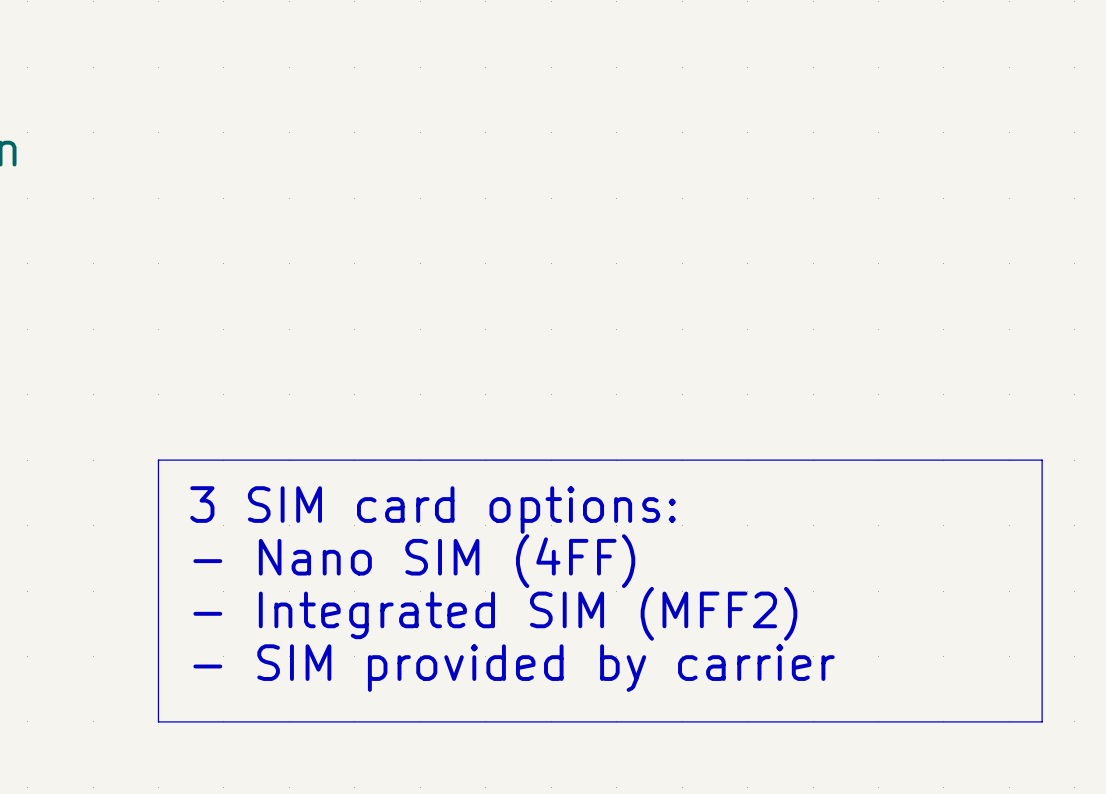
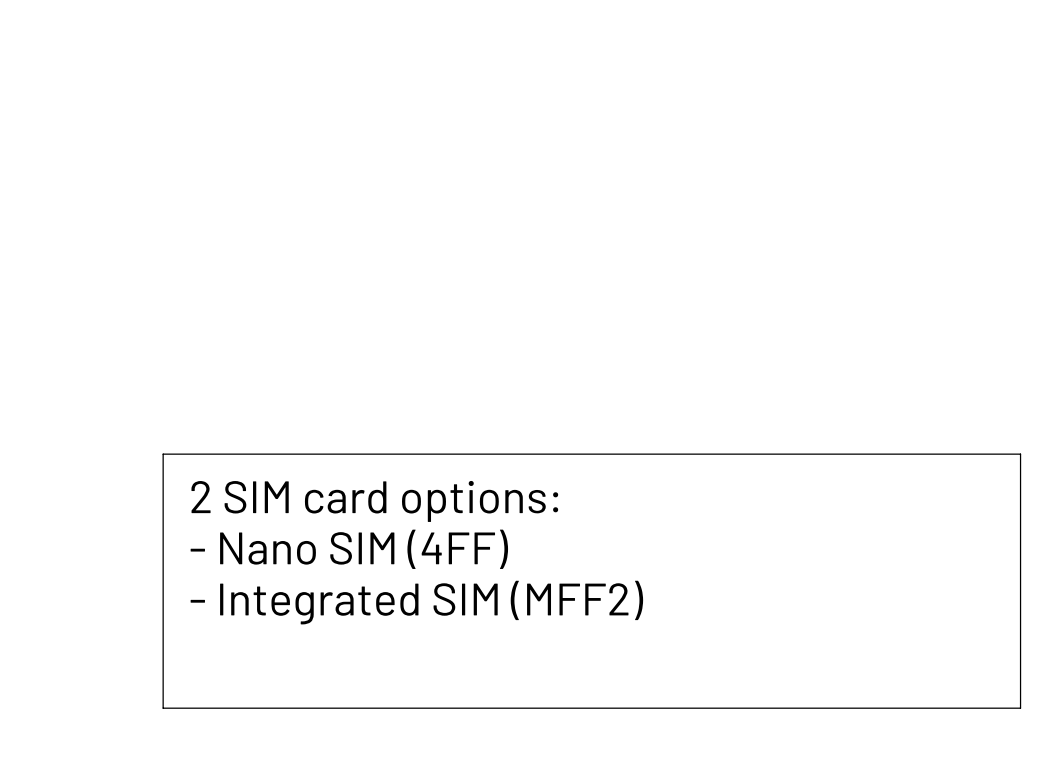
text: 3 SIM card options: (433, 509) -> 2 SIM card options: (374, 501)
text: - SIM provided by carrier (514, 668) -> none

